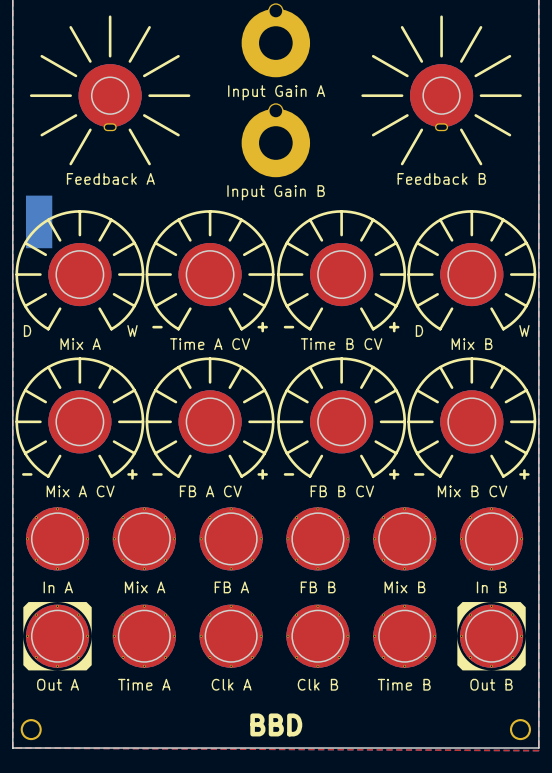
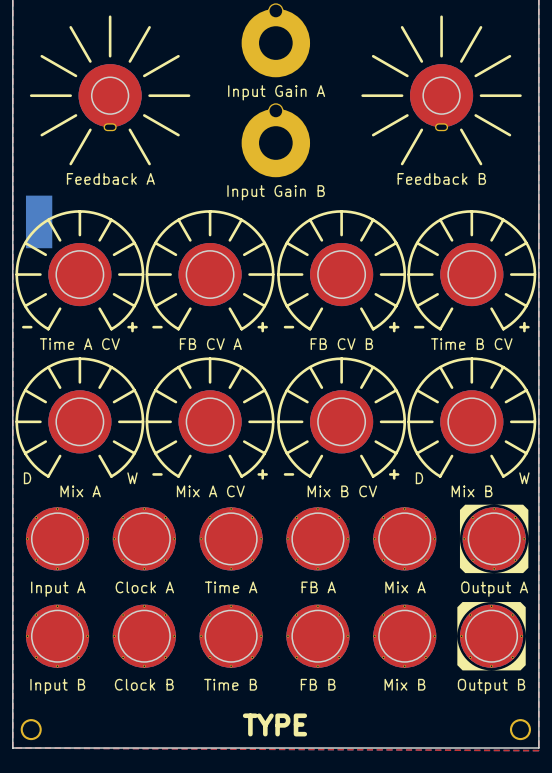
part footprint: [15, 210, 145, 331] -> [15, 210, 145, 333]
part footprint: [407, 210, 537, 331] -> [407, 210, 537, 333]
part text: D (27, 330) -> none
part text: W (132, 330) -> none
part text: D (419, 330) -> none
part text: W (524, 330) -> none
part value: Mix A (80, 344) -> Time A CV (79, 344)
part value: Time A CV (210, 344) -> FB CV A (210, 344)
part value: Time B CV (341, 344) -> FB CV B (341, 344)
part value: Mix B (472, 344) -> Time B CV (471, 344)
part footprint: [15, 357, 145, 480] -> [15, 357, 145, 478]
part footprint: [407, 357, 537, 480] -> [407, 357, 537, 478]
part text: none -> D (27, 478)
part text: none -> W (132, 478)
part text: none -> D (419, 478)
part text: none -> W (524, 478)
part value: Mix A CV (80, 491) -> Mix A (80, 491)
part value: FB A CV (210, 491) -> Mix A CV (210, 491)
part value: FB B CV (342, 491) -> Mix B CV (342, 491)
part value: Mix B CV (472, 491) -> Mix B (472, 491)
part footprint: [459, 507, 524, 571] -> [459, 504, 529, 574]
part value: In A (58, 587) -> Input A (58, 589)
part value: Mix A (145, 587) -> Clock A (144, 587)
part value: FB A (231, 587) -> Time A (231, 587)
part value: FB B (318, 587) -> FB A (318, 587)
part value: Mix B (404, 587) -> Mix A (405, 587)
part value: In B (491, 587) -> Output A (494, 589)
part footprint: [23, 602, 92, 671] -> [25, 604, 90, 668]
part value: Out A (58, 684) -> Input B (57, 686)
part value: Time A (144, 684) -> Clock B (144, 684)
part value: Clk A (231, 684) -> Time B (230, 684)
part value: Clk B (317, 684) -> FB B (318, 684)
part value: Time B (404, 684) -> Mix B (404, 684)
part value: Out B (491, 684) -> Output B (491, 686)
text: BBD (276, 724) -> TYPE (274, 724)

